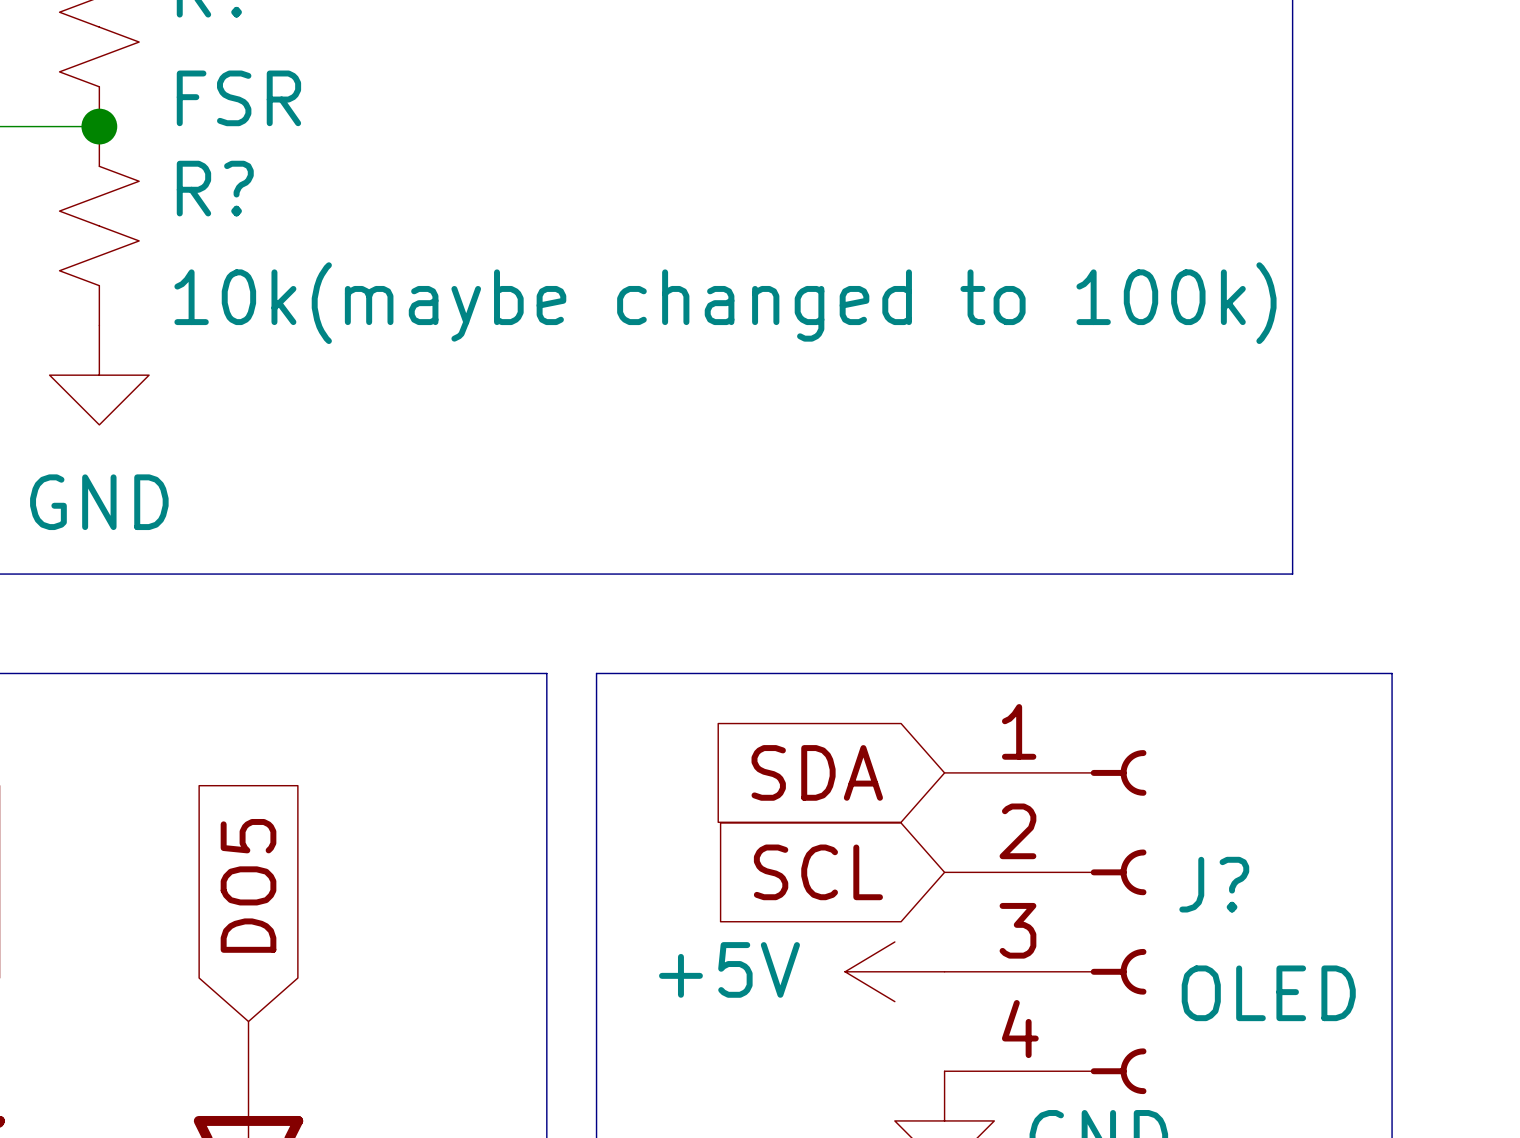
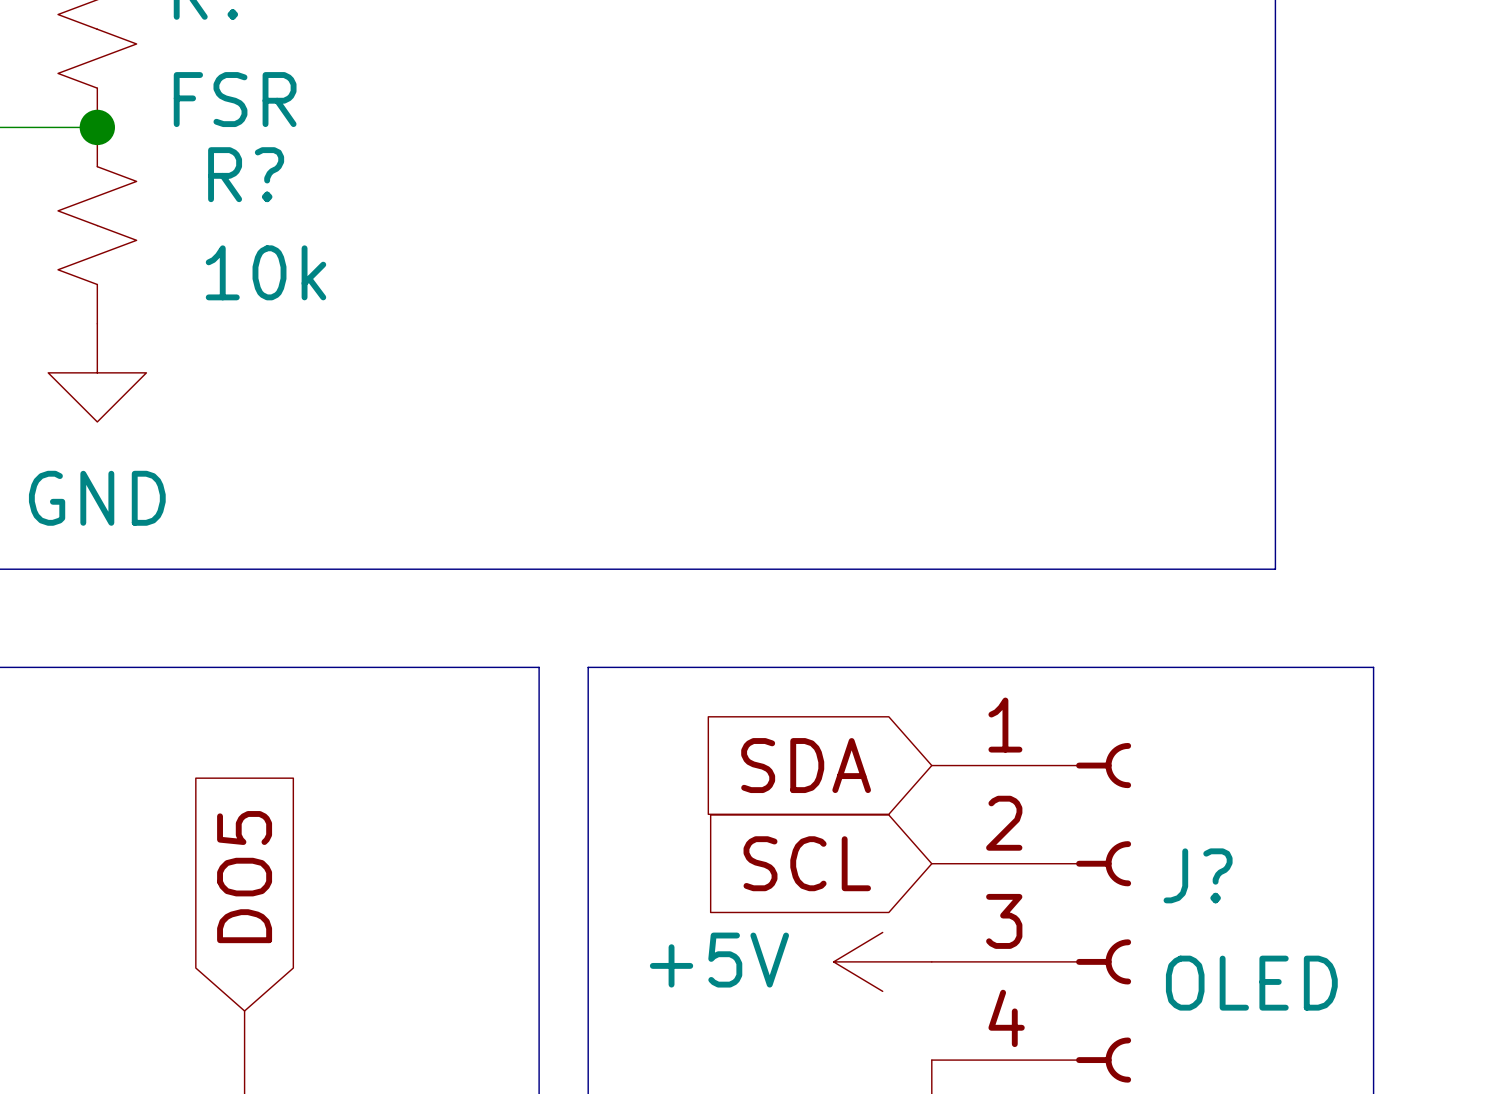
R? name position: R? (215, 188) -> R? (246, 174)
R? value: 10k(maybe changed to 100k) (725, 303) -> 10k (265, 272)

